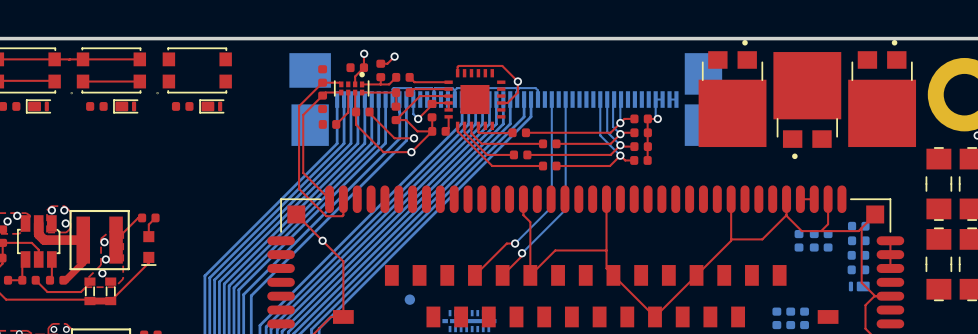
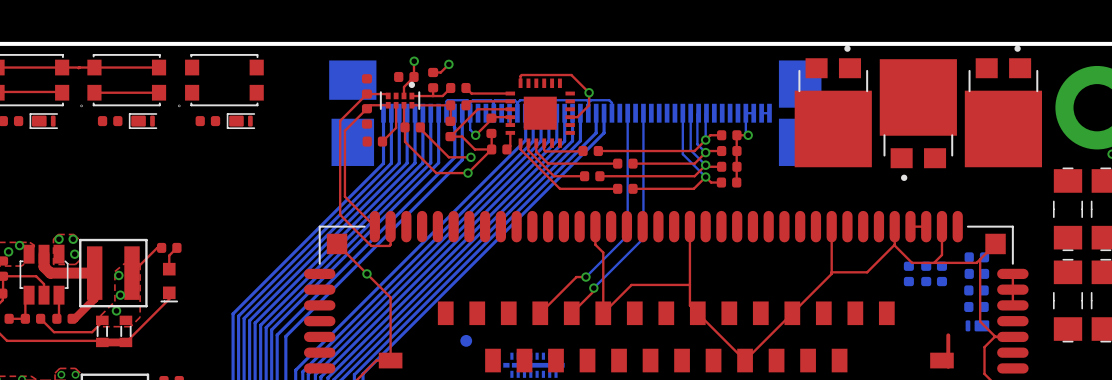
top track: none -> (948, 335) (948, 366)
part: (776, 318) -> none
part: (790, 318) -> none
part: (804, 318) -> none

